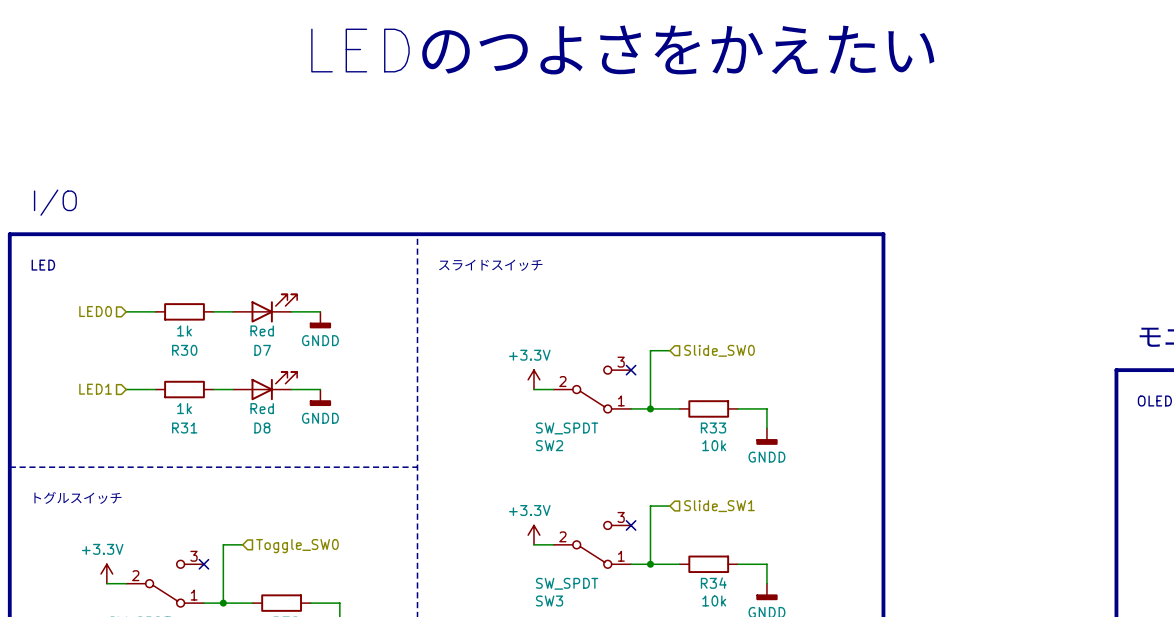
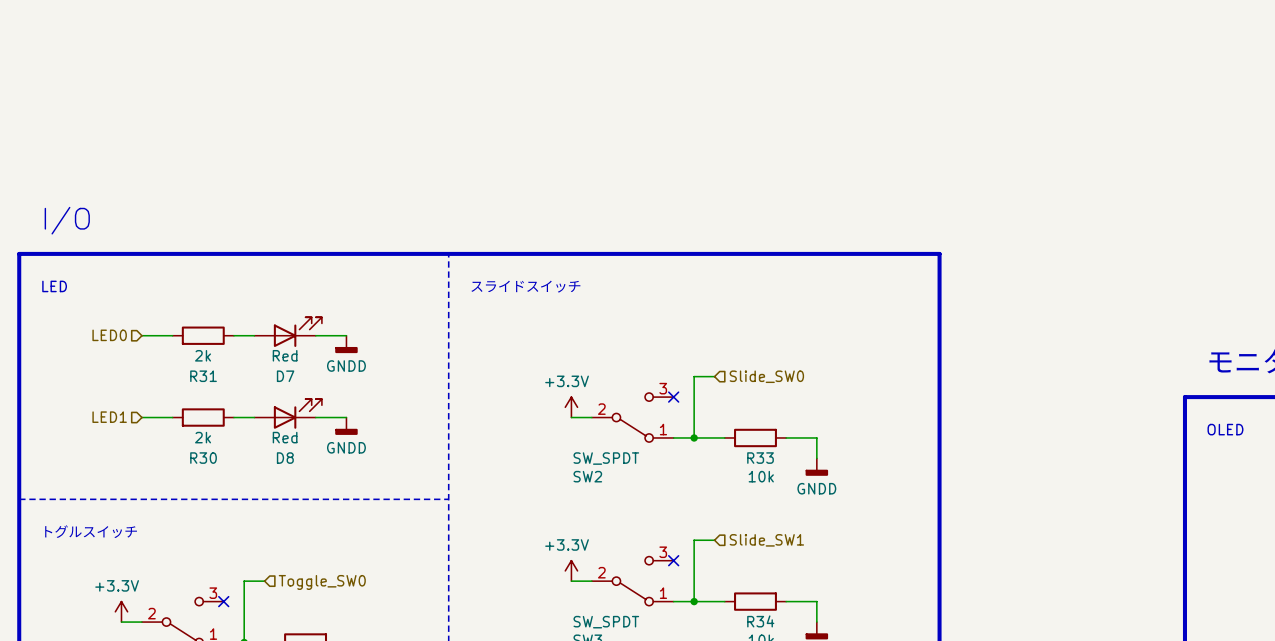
text: LEDのつよさをかえたい (623, 49) -> none
R30 value: 1k (184, 330) -> 2k (203, 355)
R30 name: R30 (184, 350) -> R31 (203, 376)
R31 value: 1k (184, 408) -> 2k (203, 437)
R31 name: R31 (184, 428) -> R30 (203, 458)

